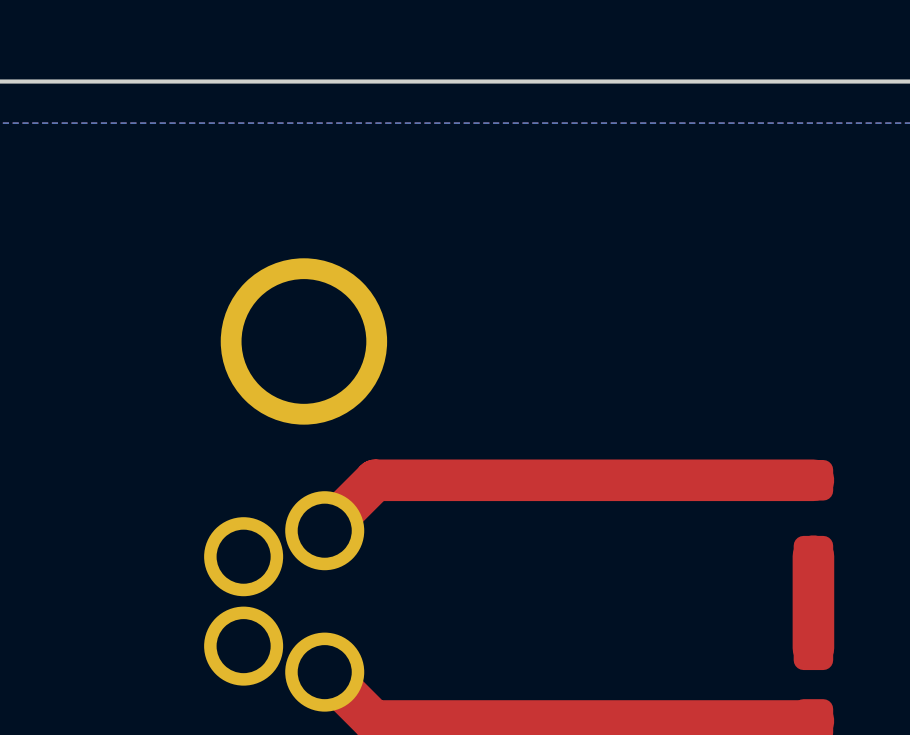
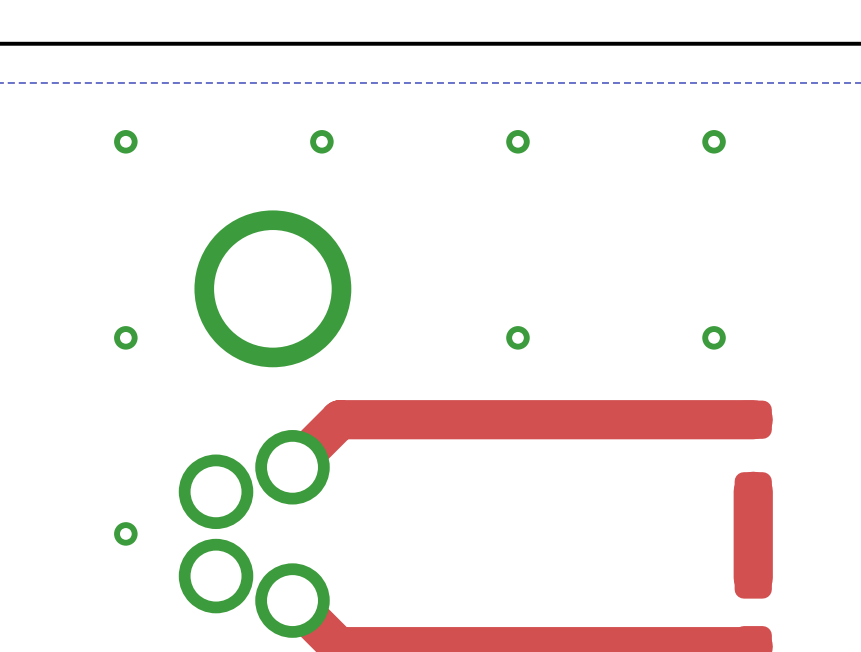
via: none -> (125, 141)
via: none -> (321, 141)
via: none -> (517, 141)
via: none -> (714, 141)
via: none -> (125, 337)
via: none -> (517, 337)
via: none -> (714, 337)
via: none -> (125, 533)

